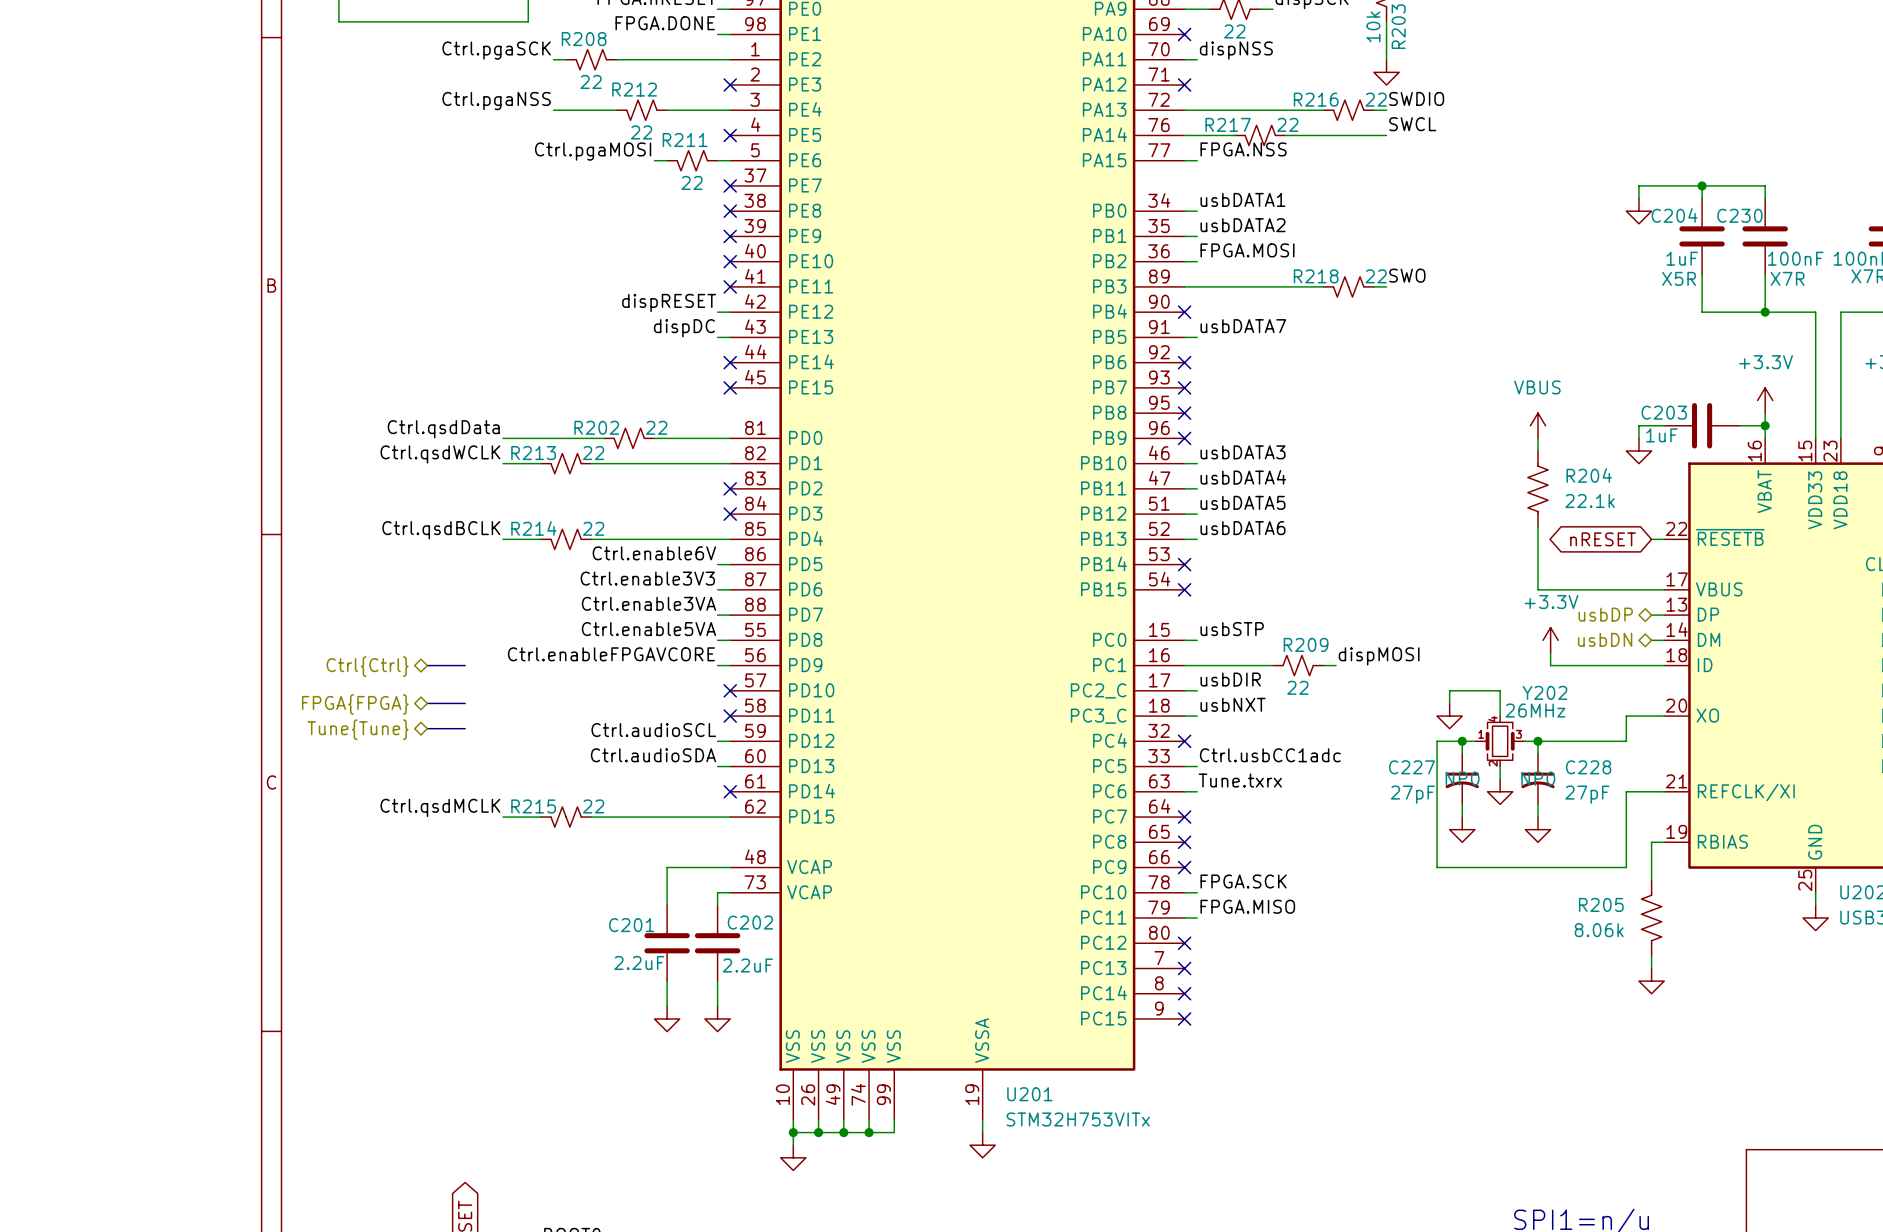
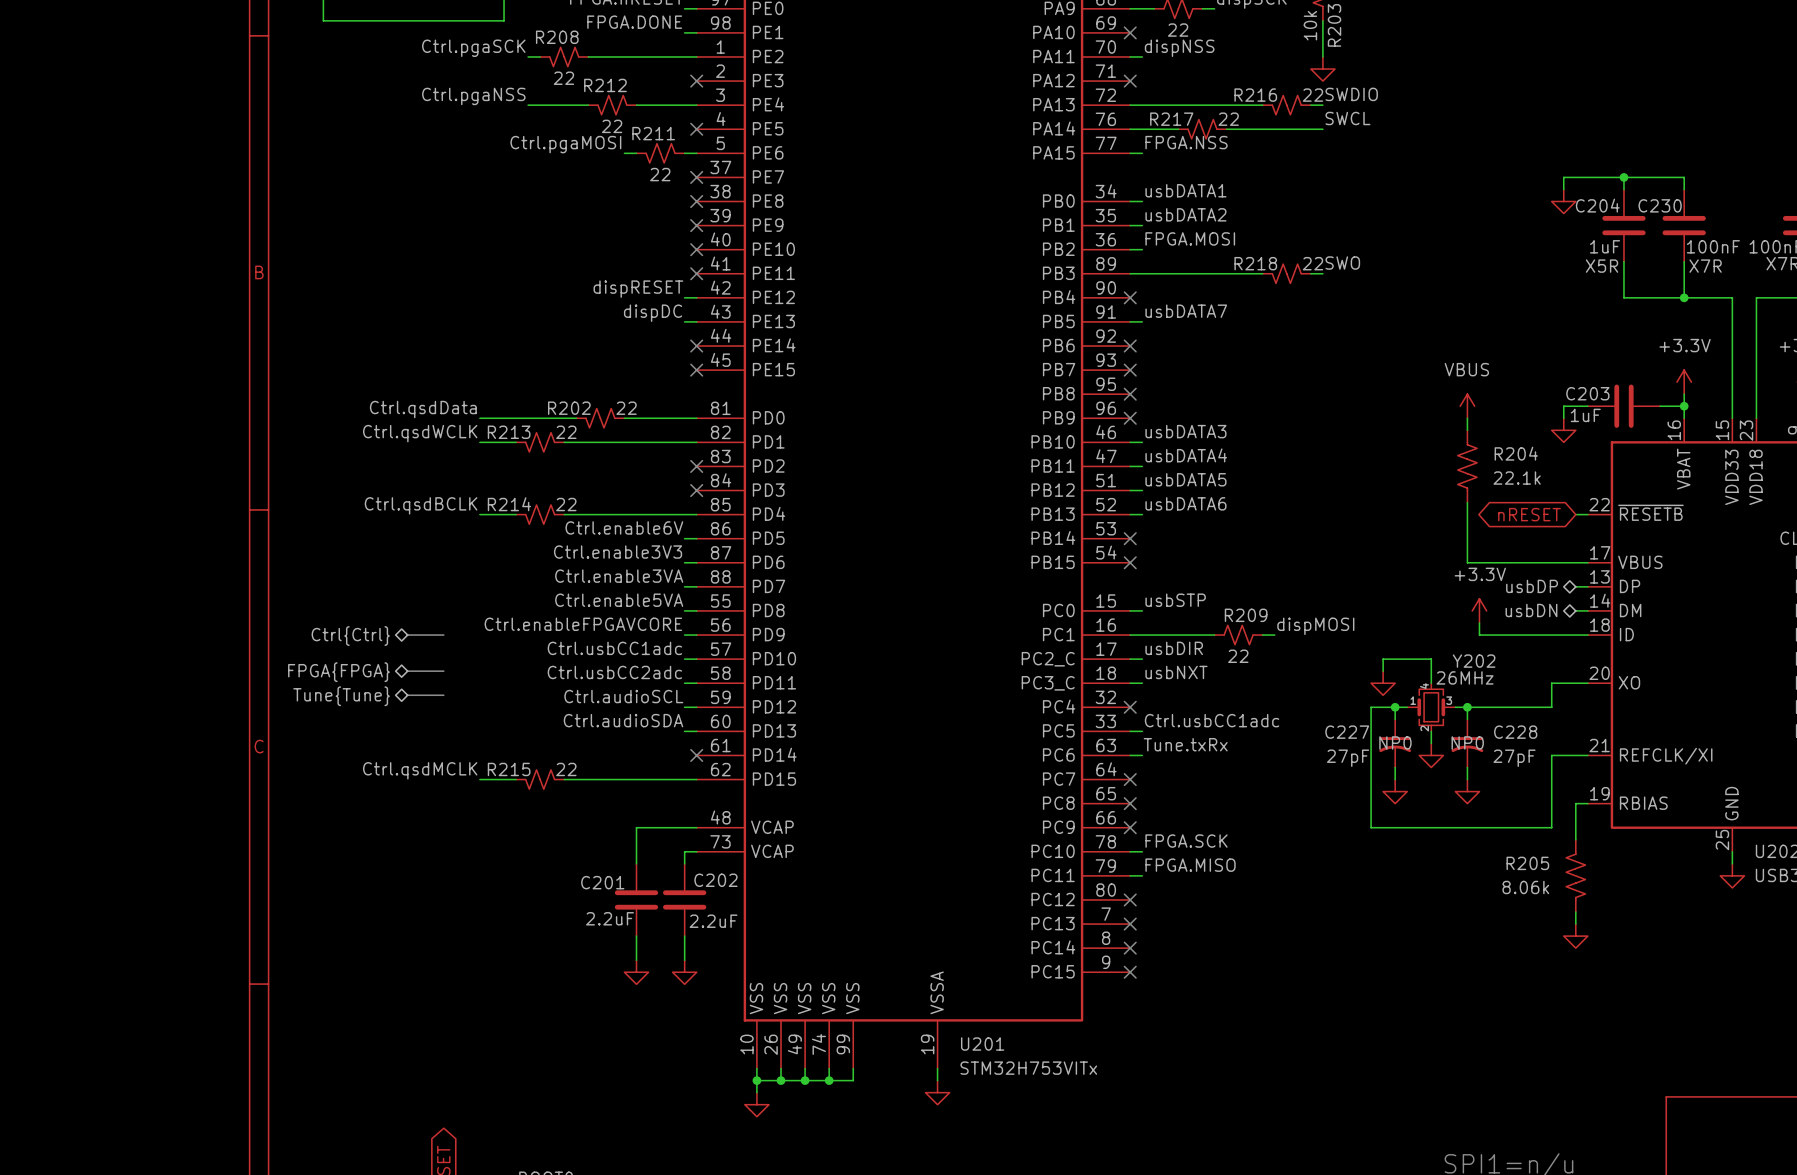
label: none -> Ctrl.usbCC1adc (614, 648)
wire: none -> (684, 659) (696, 659)
no-connect mark: (730, 690) -> none
label: none -> Ctrl.usbCC2adc (614, 672)
wire: none -> (684, 683) (696, 683)
no-connect mark: (730, 716) -> none
label: Tune.txrx (1240, 780) -> Tune.txRx (1185, 744)

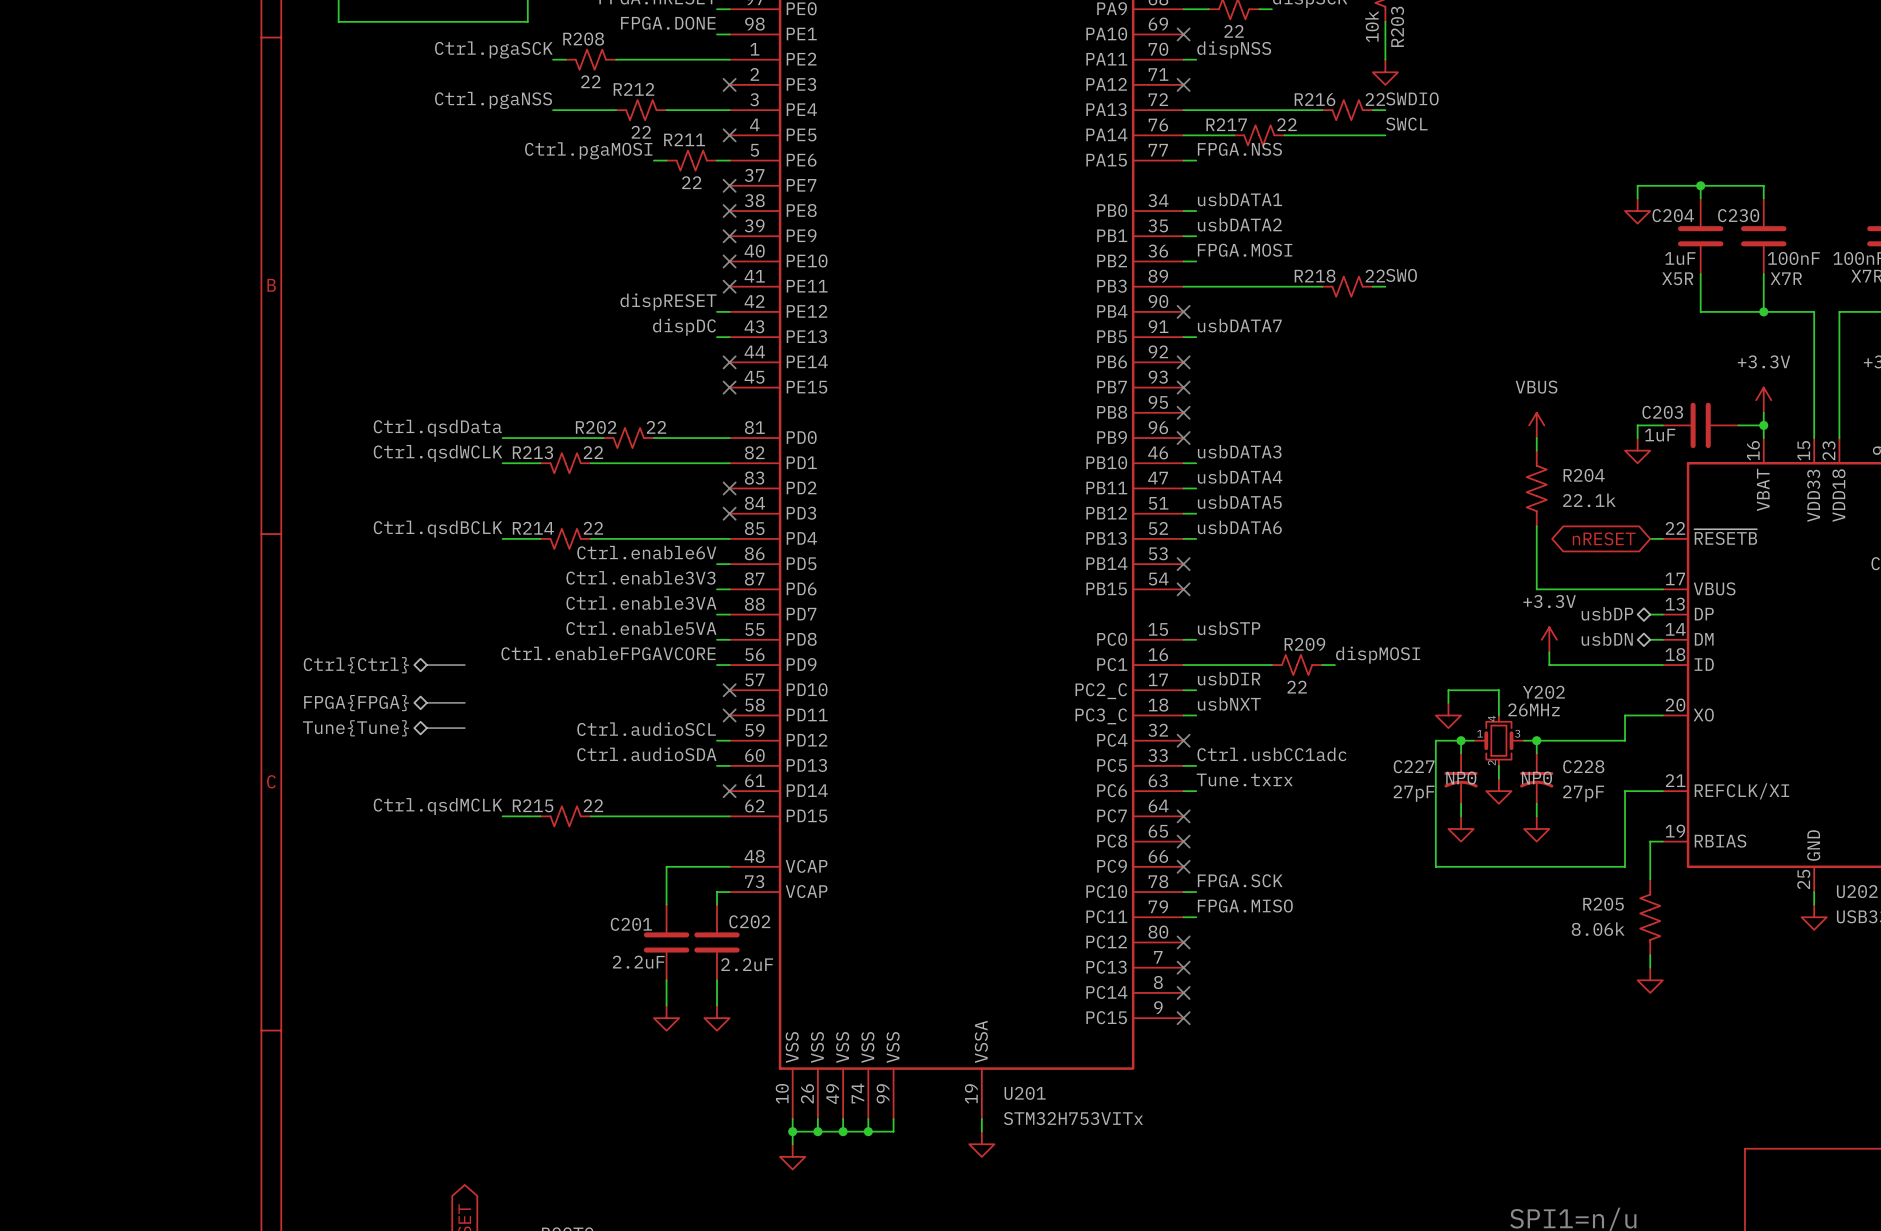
label: Ctrl.usbCC1adc (614, 648) -> none
wire: (684, 659) (696, 659) -> none
no-connect mark: none -> (729, 690)
label: Ctrl.usbCC2adc (614, 672) -> none
wire: (684, 683) (696, 683) -> none
no-connect mark: none -> (729, 715)
label: Tune.txRx (1185, 744) -> Tune.txrx (1244, 780)

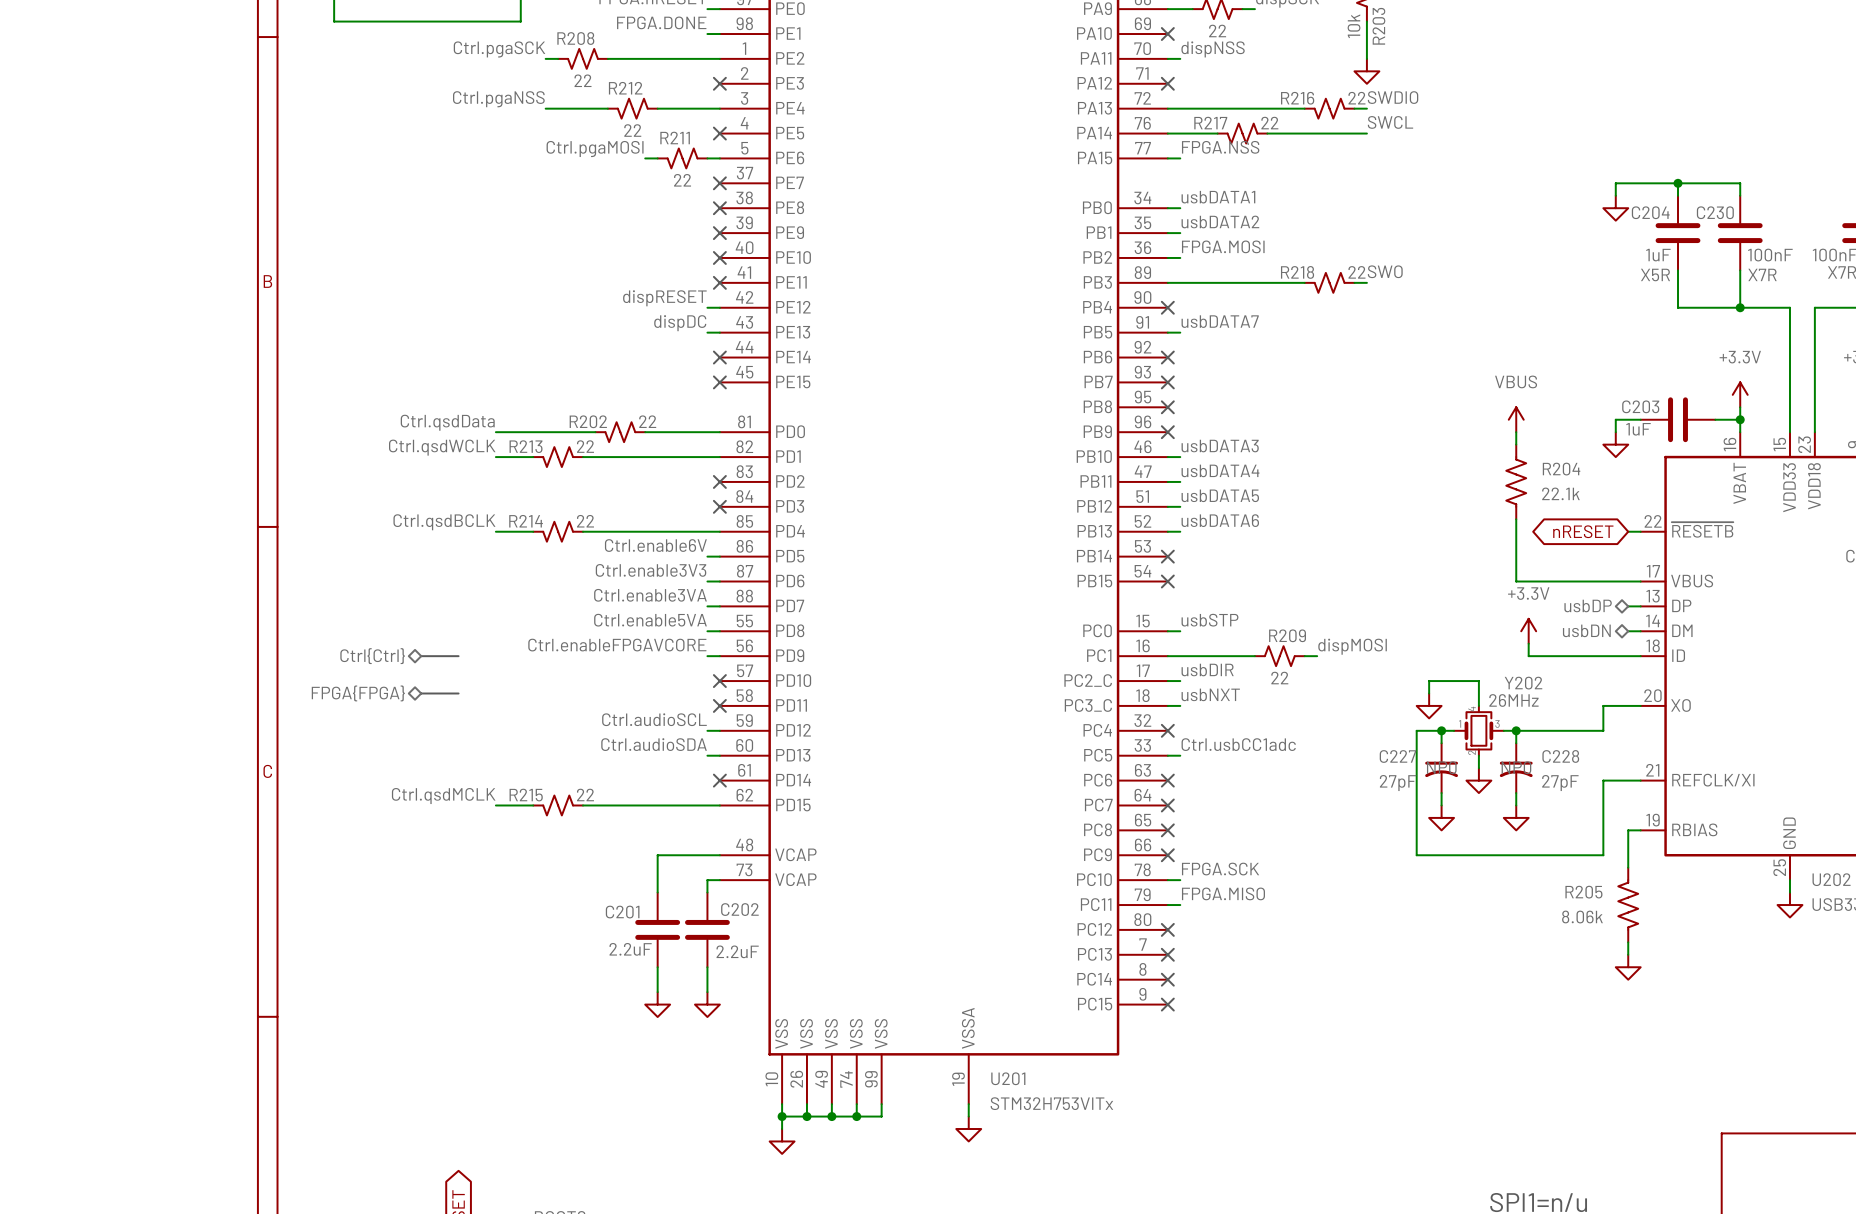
hierarchical label: Tune{Tune} (355, 728) -> none
bus: (426, 728) (464, 728) -> none
label: Tune.txrx (1244, 780) -> none
wire: (1183, 791) (1196, 791) -> none
no-connect mark: none -> (1167, 780)

